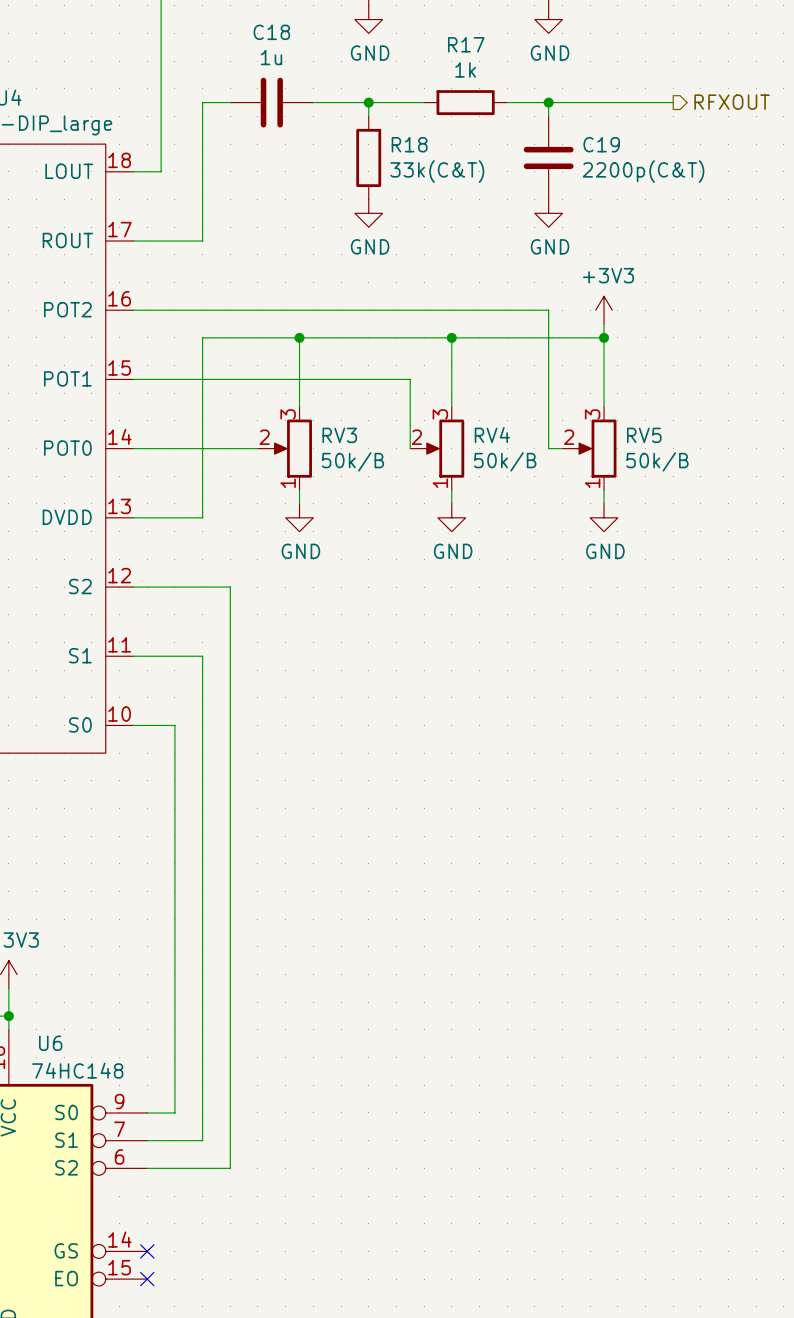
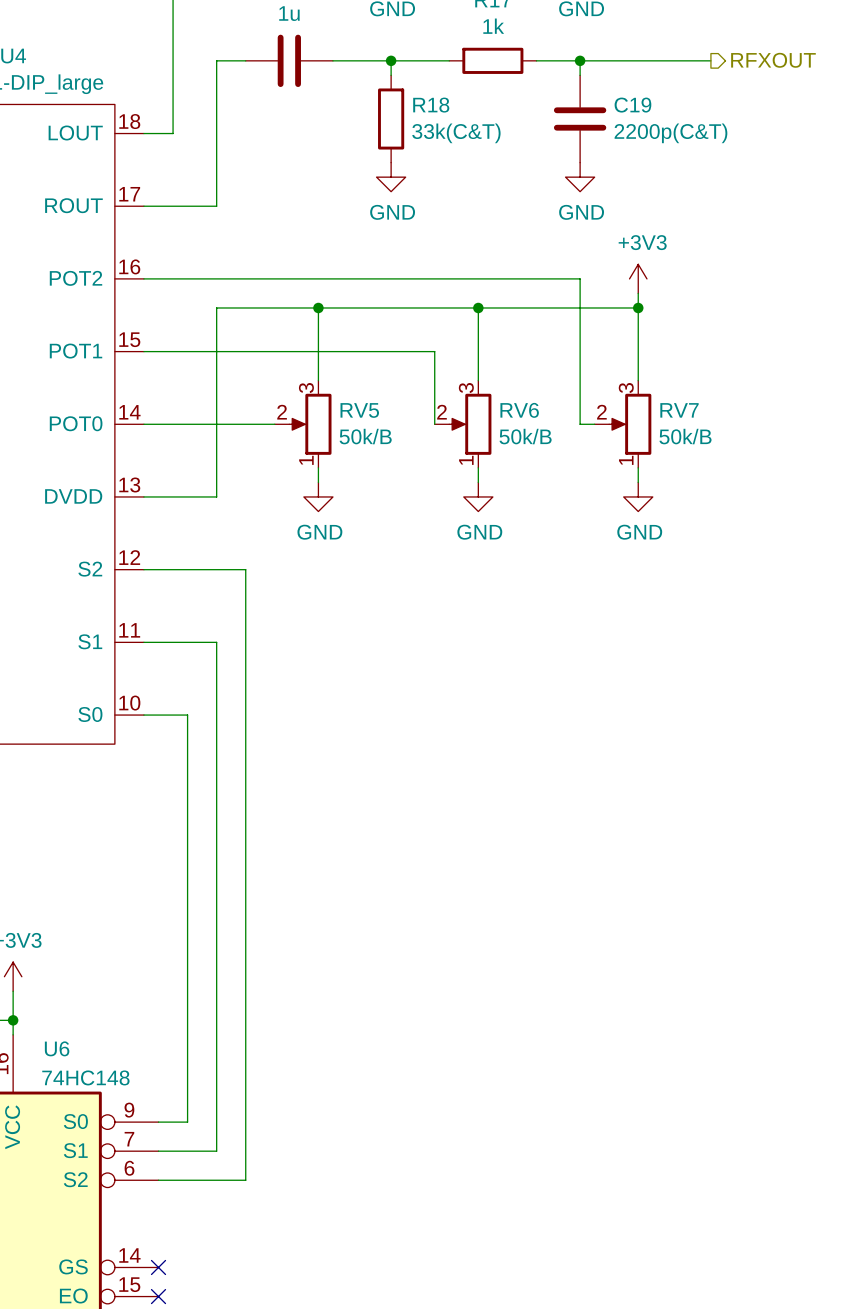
RV3 name: RV3 (339, 435) -> RV5 (359, 410)
RV4 name: RV4 (492, 435) -> RV6 (519, 410)
RV5 name: RV5 (644, 435) -> RV7 (679, 410)

